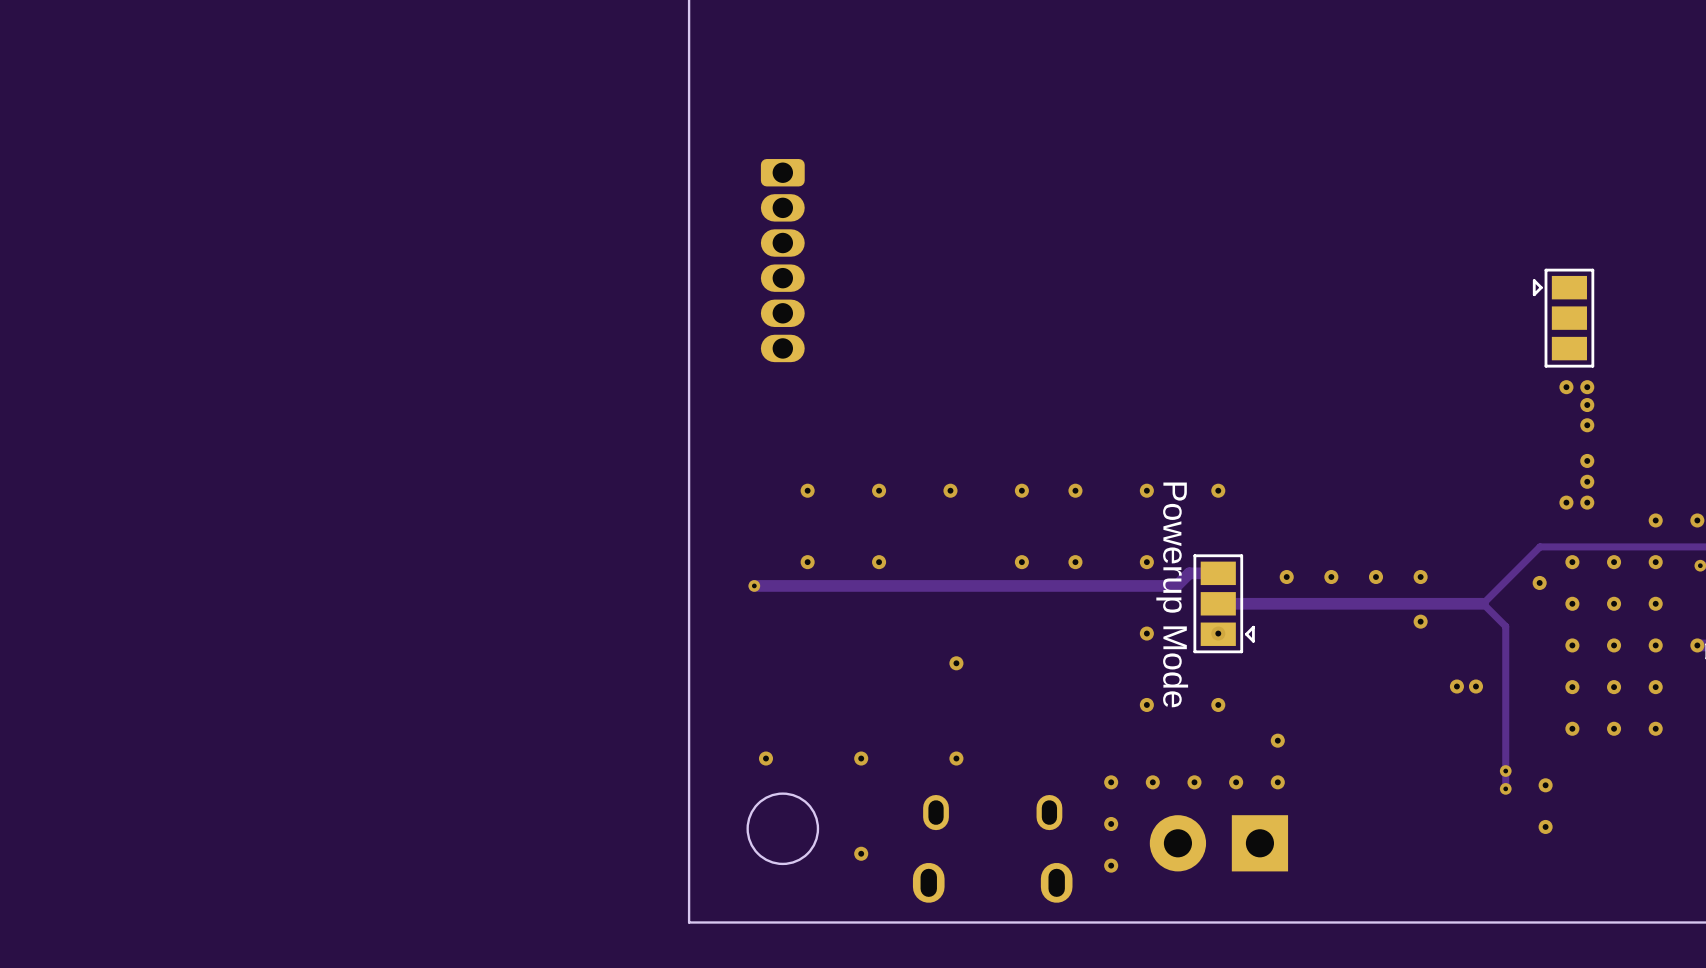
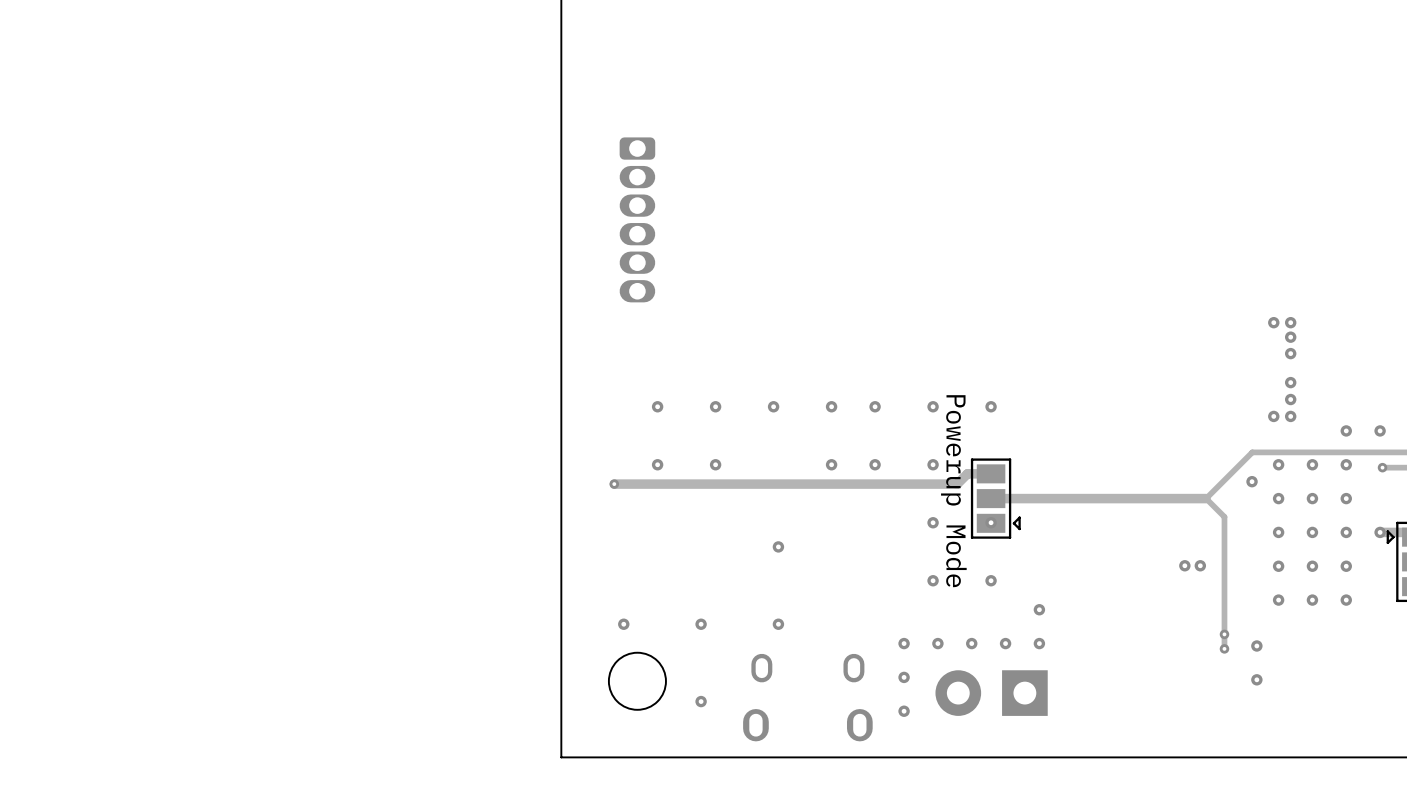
part: (1563, 318) -> none
via: (1286, 577) -> none
via: (1331, 577) -> none
via: (1376, 577) -> none
via: (1420, 577) -> none
via: (1420, 621) -> none

